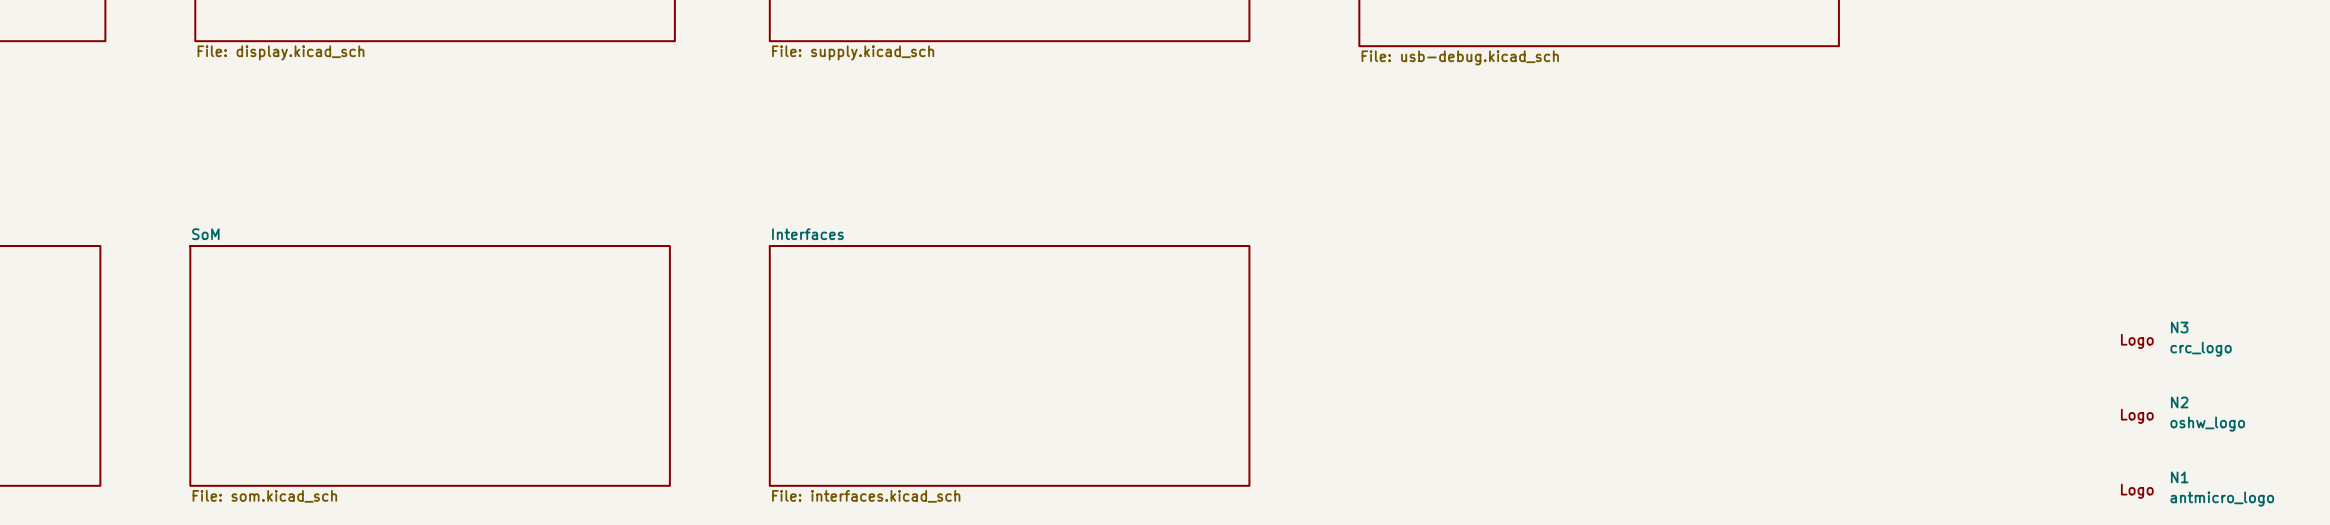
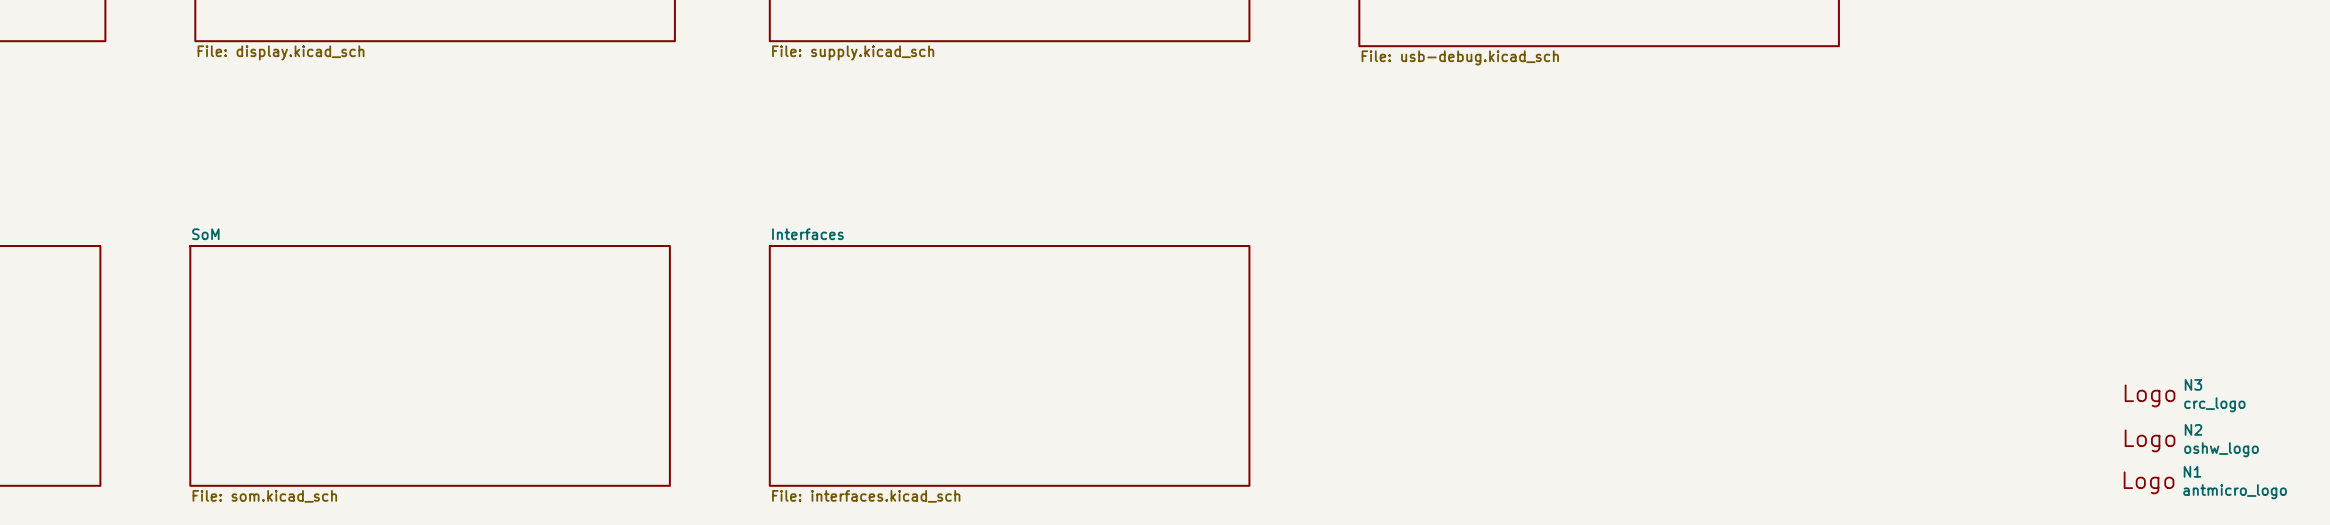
N3 symbol: [2121, 321, 2232, 357] -> [2125, 379, 2246, 413]
N2 symbol: [2121, 396, 2245, 432] -> [2125, 424, 2259, 457]
N1 symbol: [2121, 471, 2274, 507] -> [2124, 466, 2287, 499]

